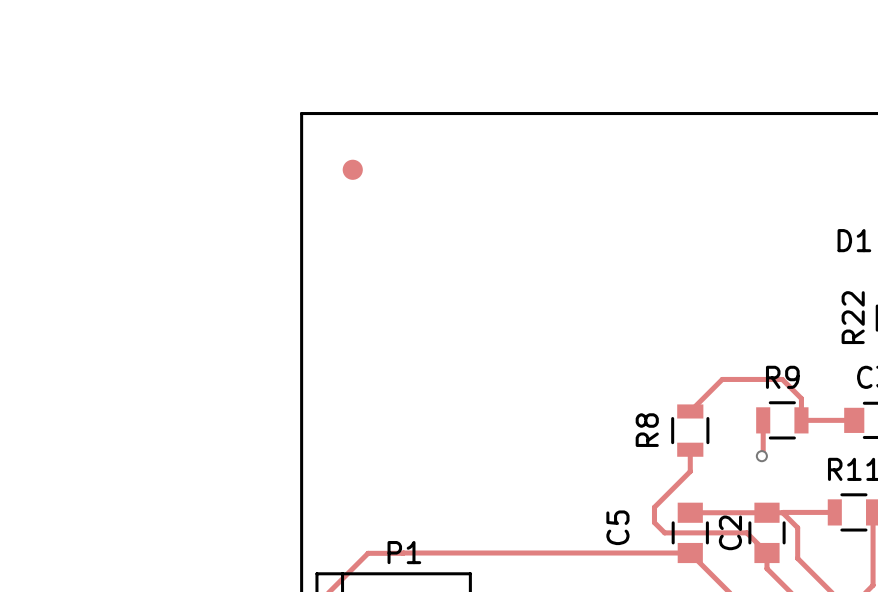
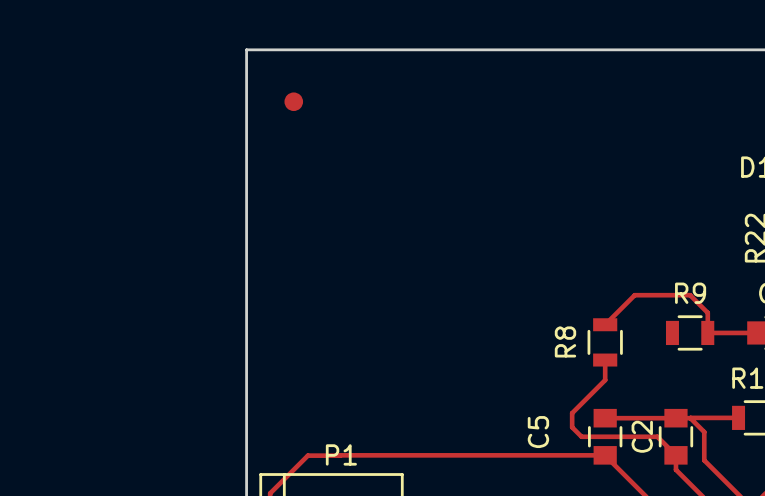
track: (763, 420) (761, 456) -> none
via: (761, 456) -> none

